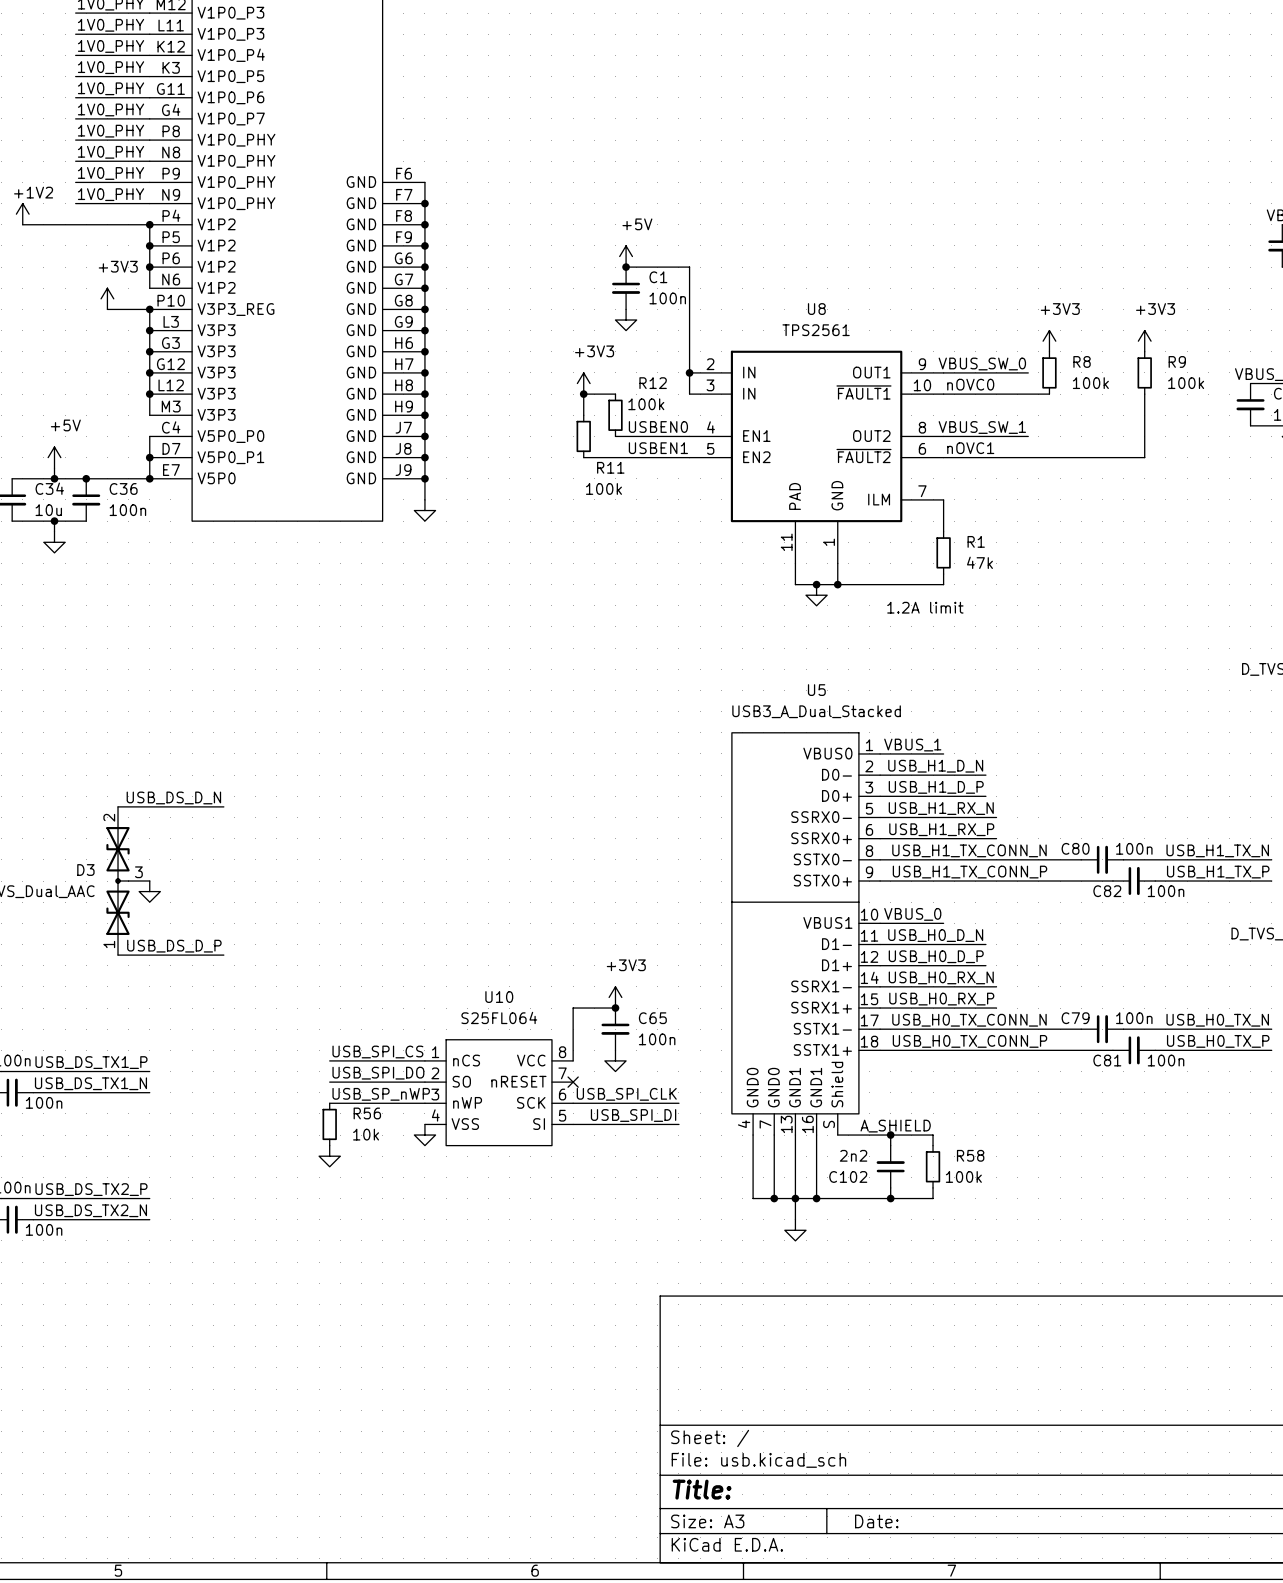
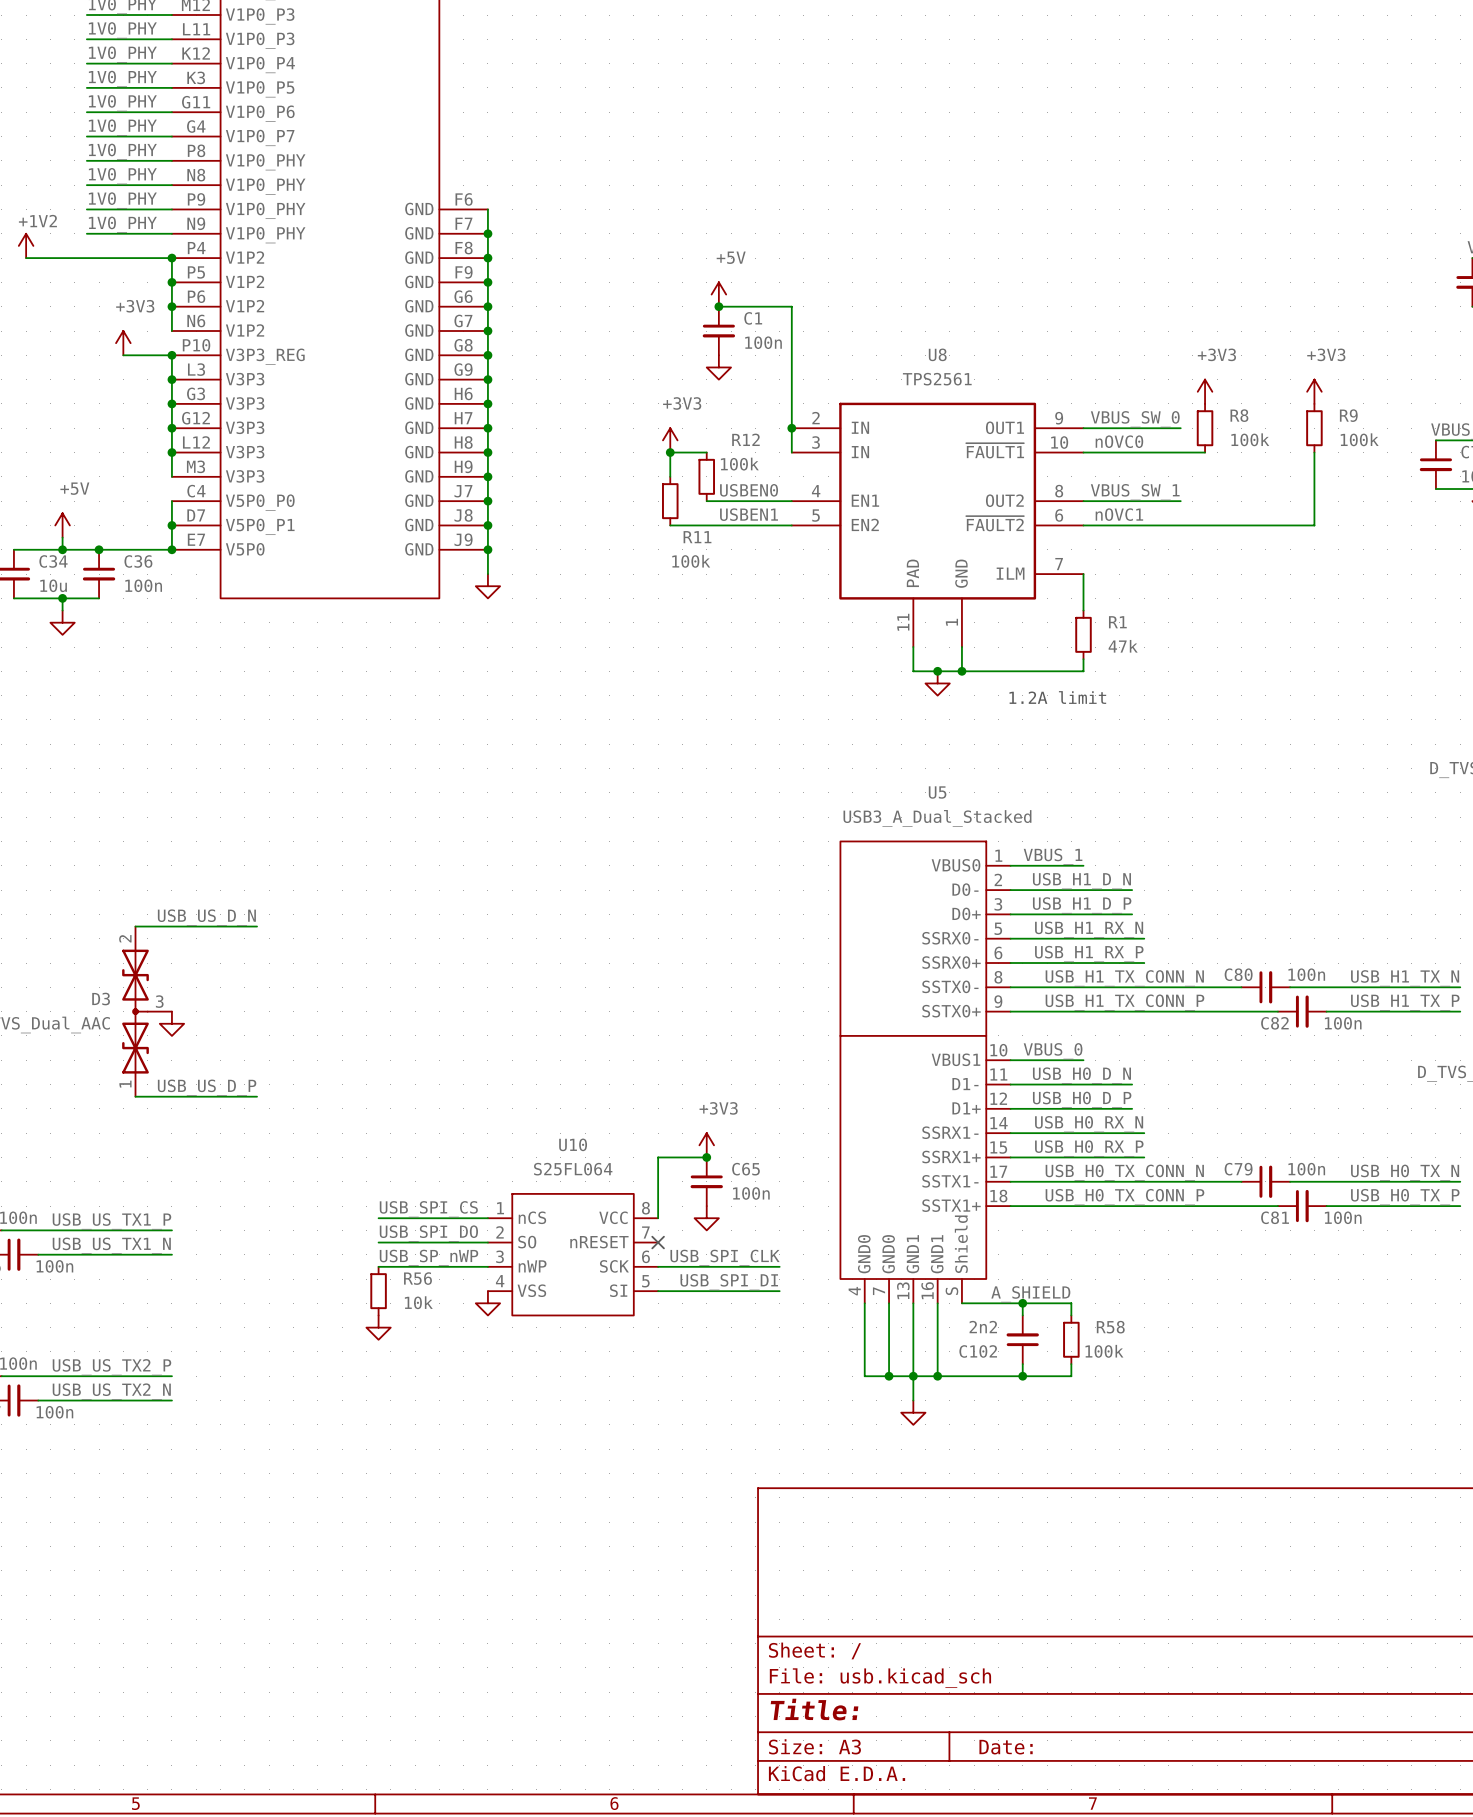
label: USB_DS_D_N (173, 797) -> USB_US_D_N (206, 917)
label: USB_DS_D_P (174, 946) -> USB_US_D_P (207, 1087)
label: USB_DS_TX1_P (91, 1062) -> USB_US_TX1_P (111, 1221)
label: USB_DS_TX1_N (90, 1083) -> USB_US_TX1_N (111, 1245)
label: USB_DS_TX2_P (91, 1189) -> USB_US_TX2_P (111, 1367)
label: USB_DS_TX2_N (90, 1210) -> USB_US_TX2_N (111, 1391)

